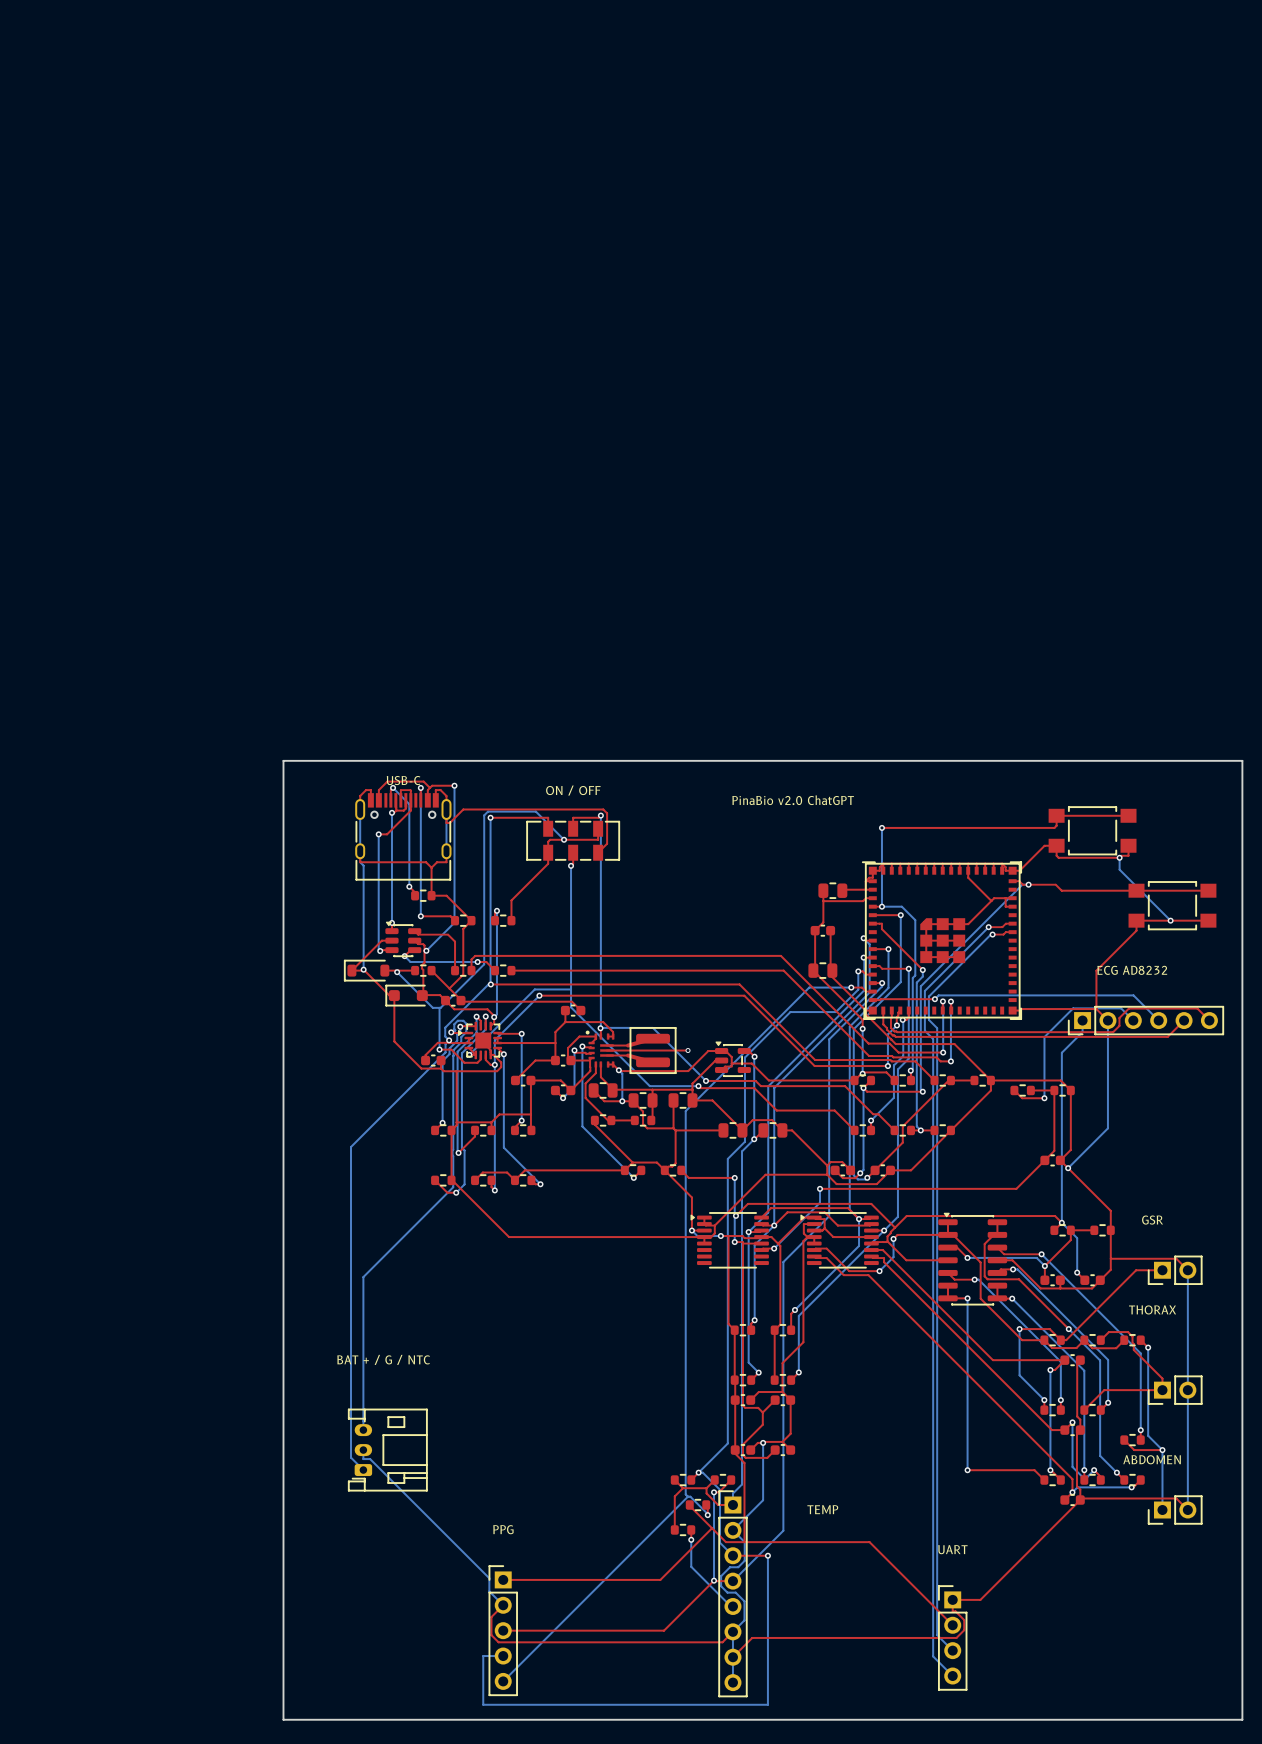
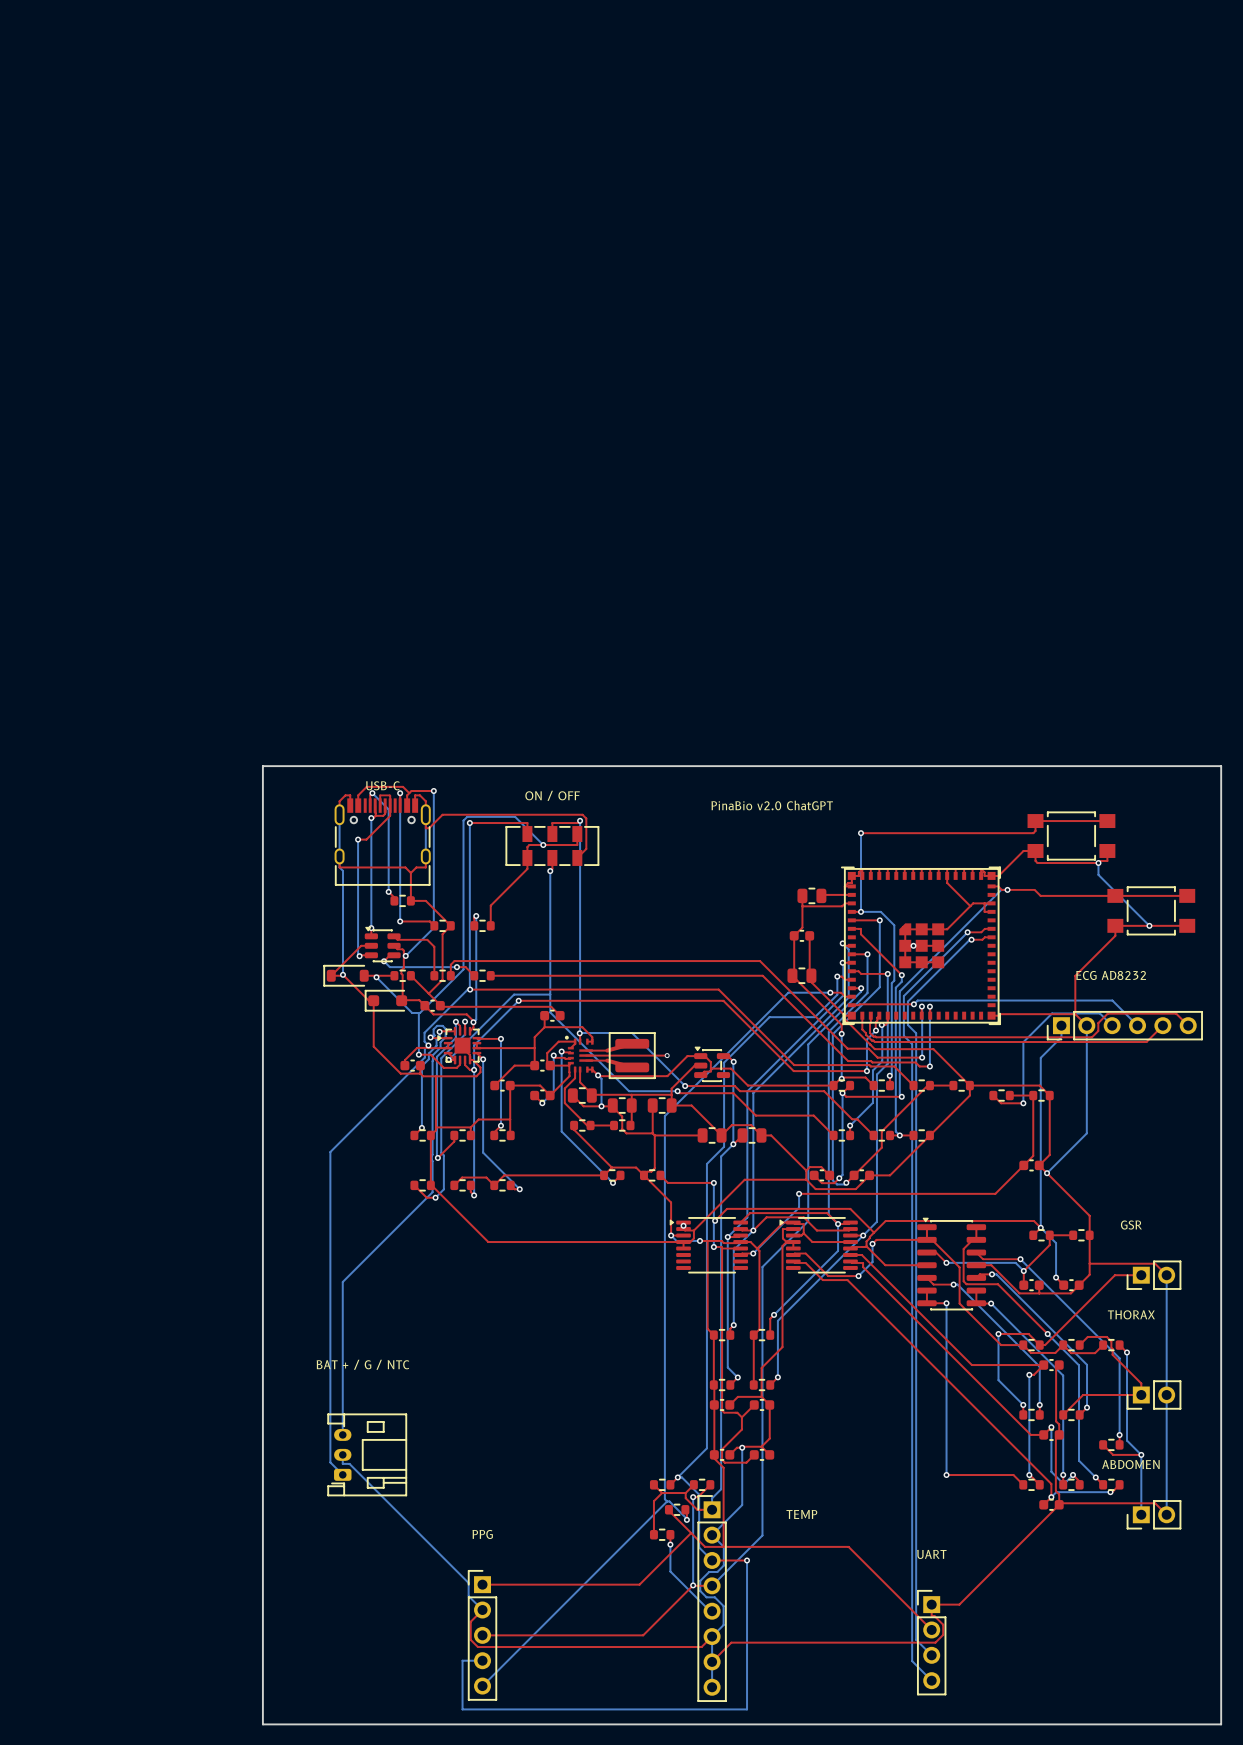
via: none -> (913, 945)
via: none -> (683, 1225)

